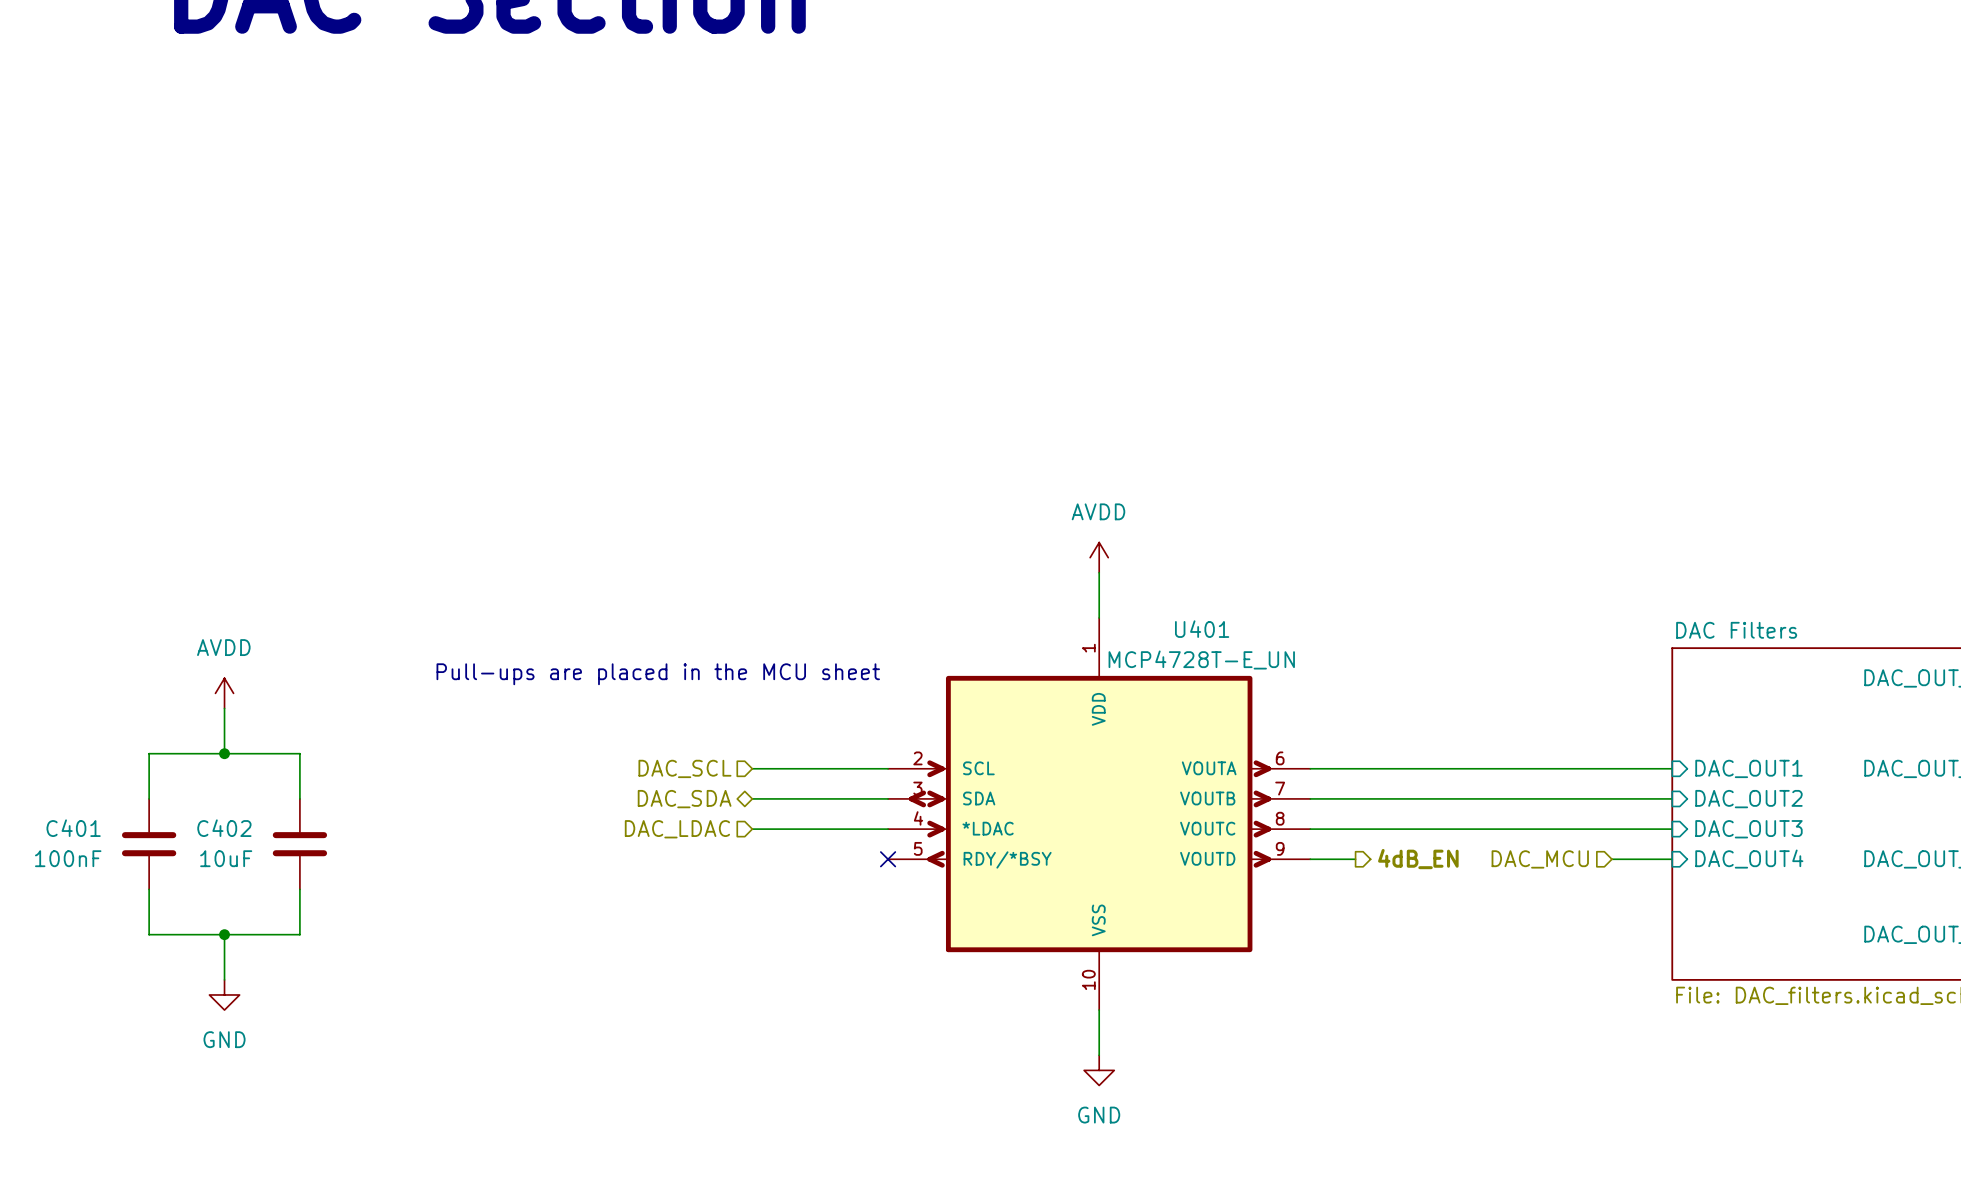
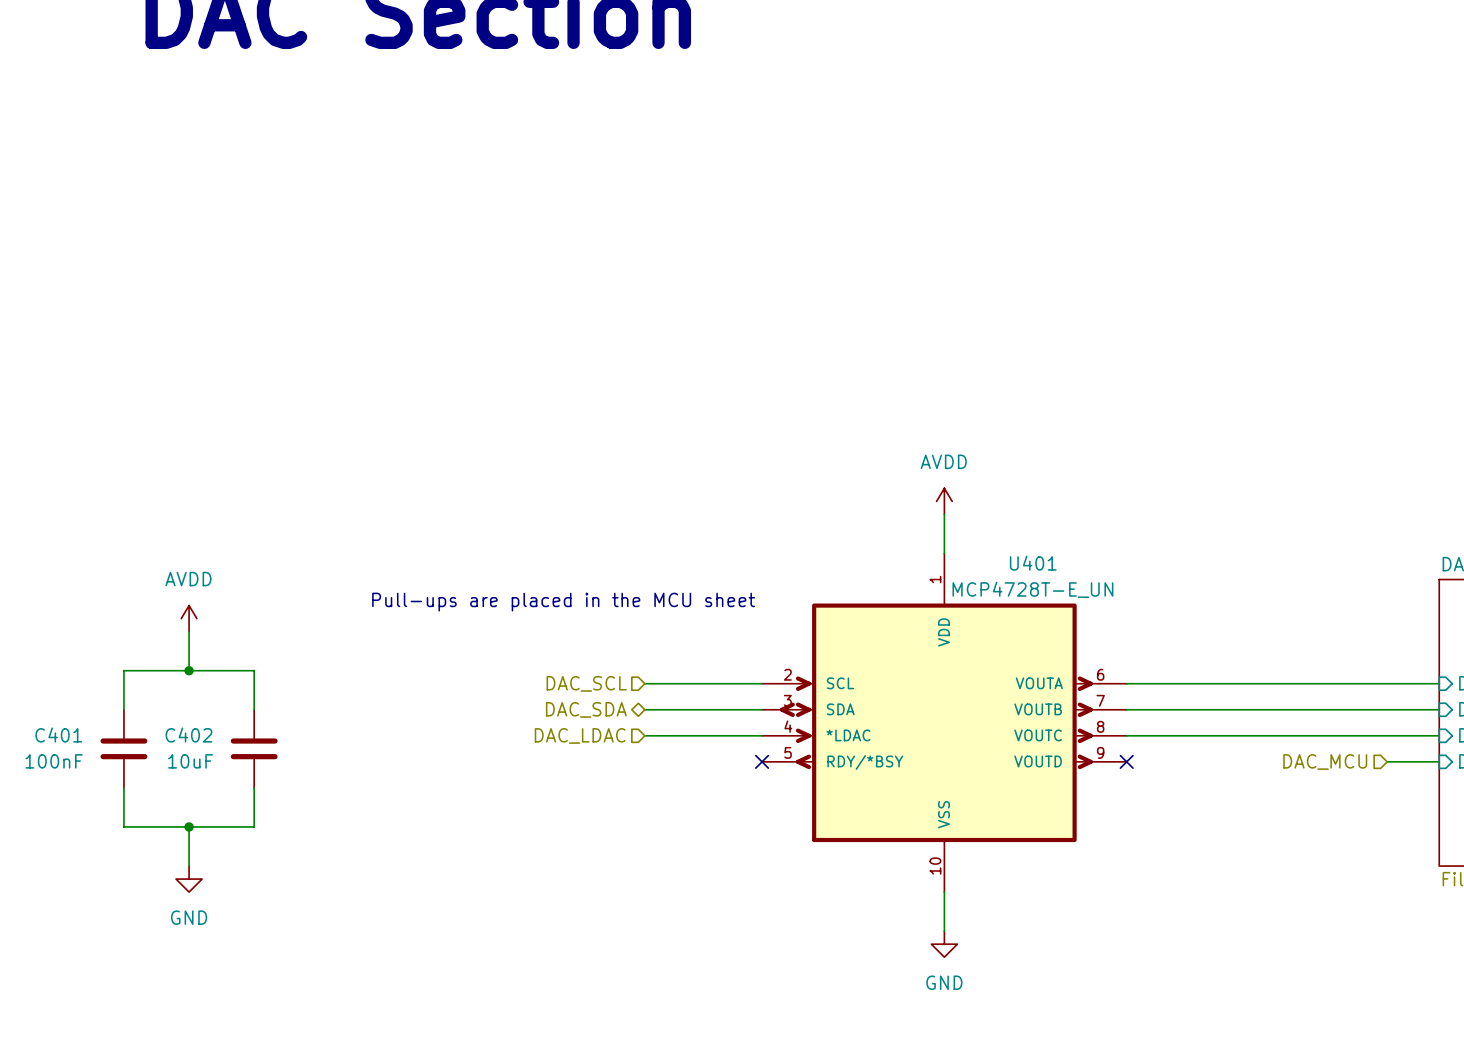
wire: (1310, 859) (1355, 859) -> none
no-connect mark: none -> (1126, 761)
hierarchical label: 4dB_EN (1418, 859) -> none

